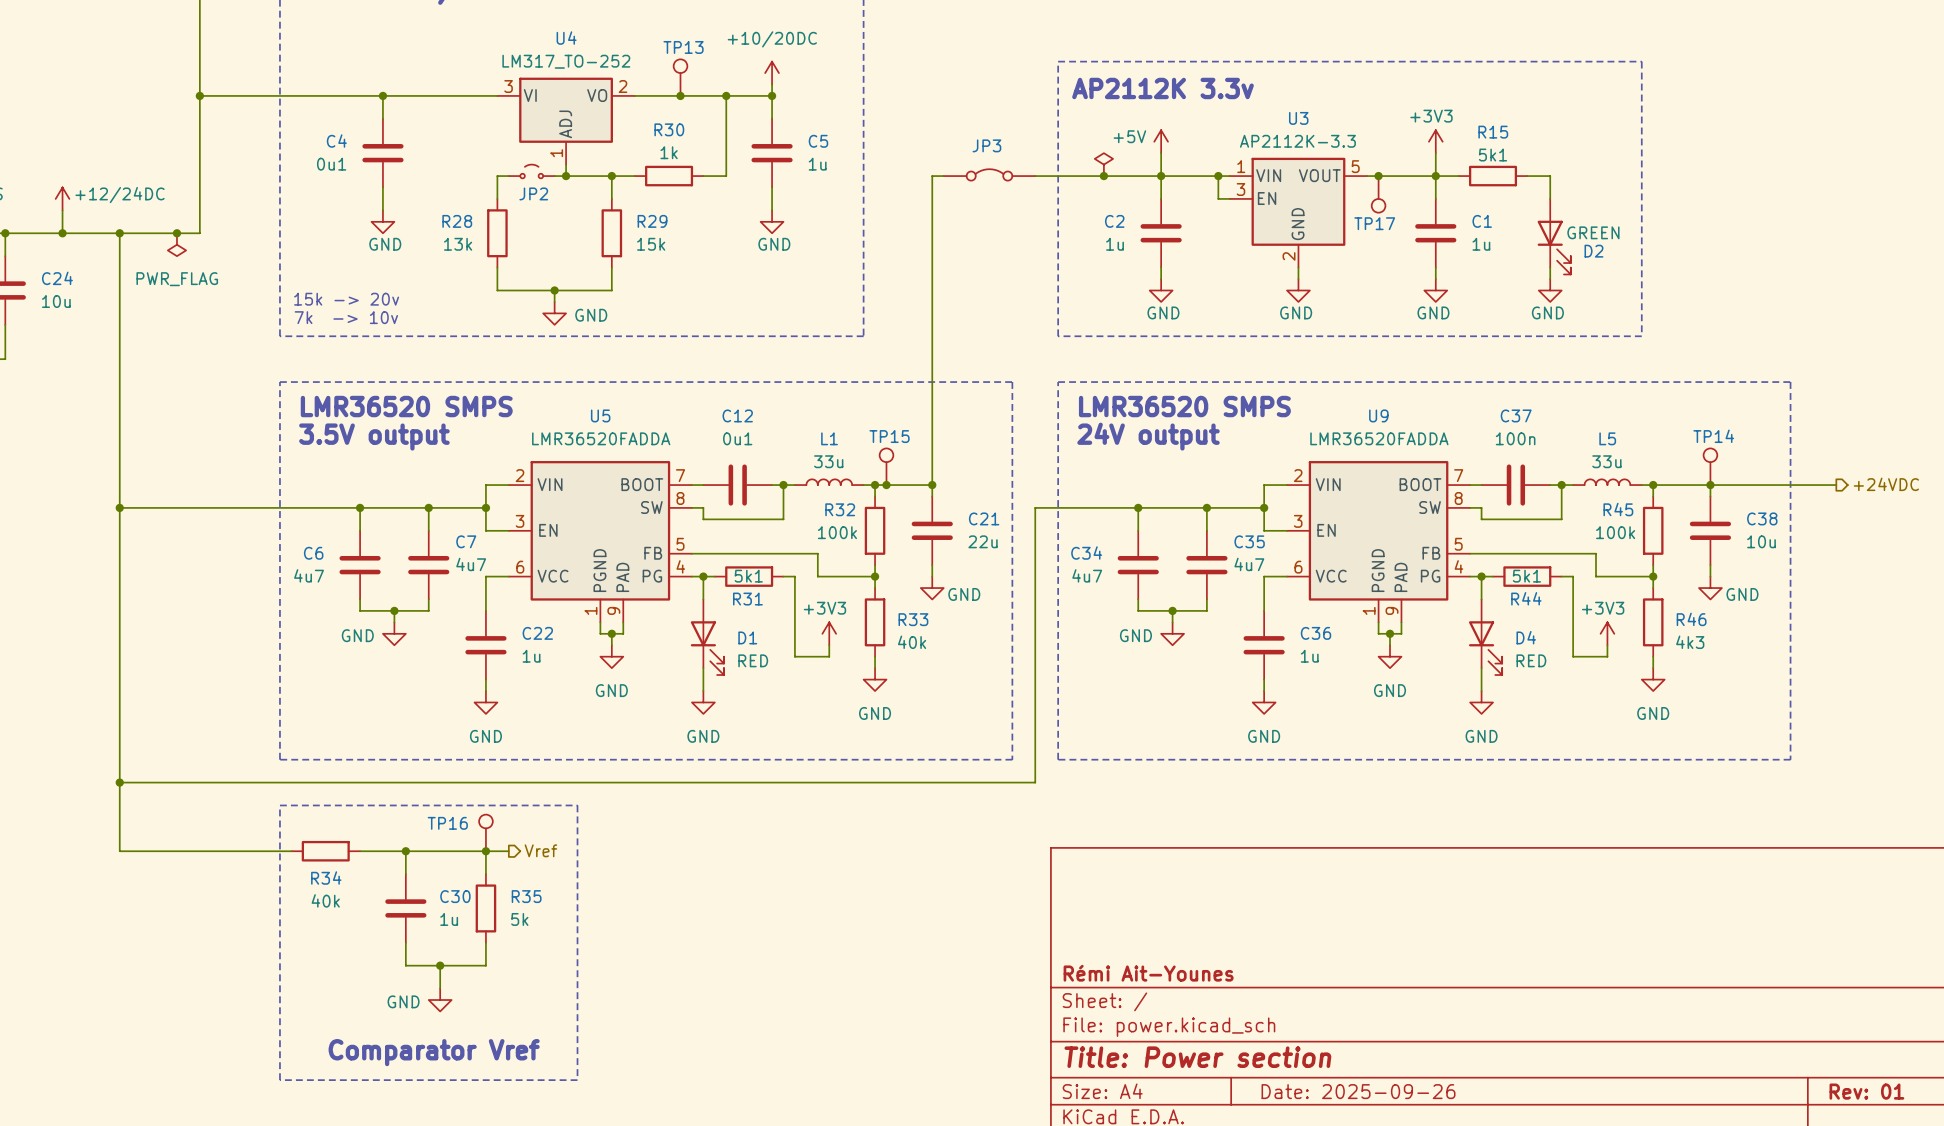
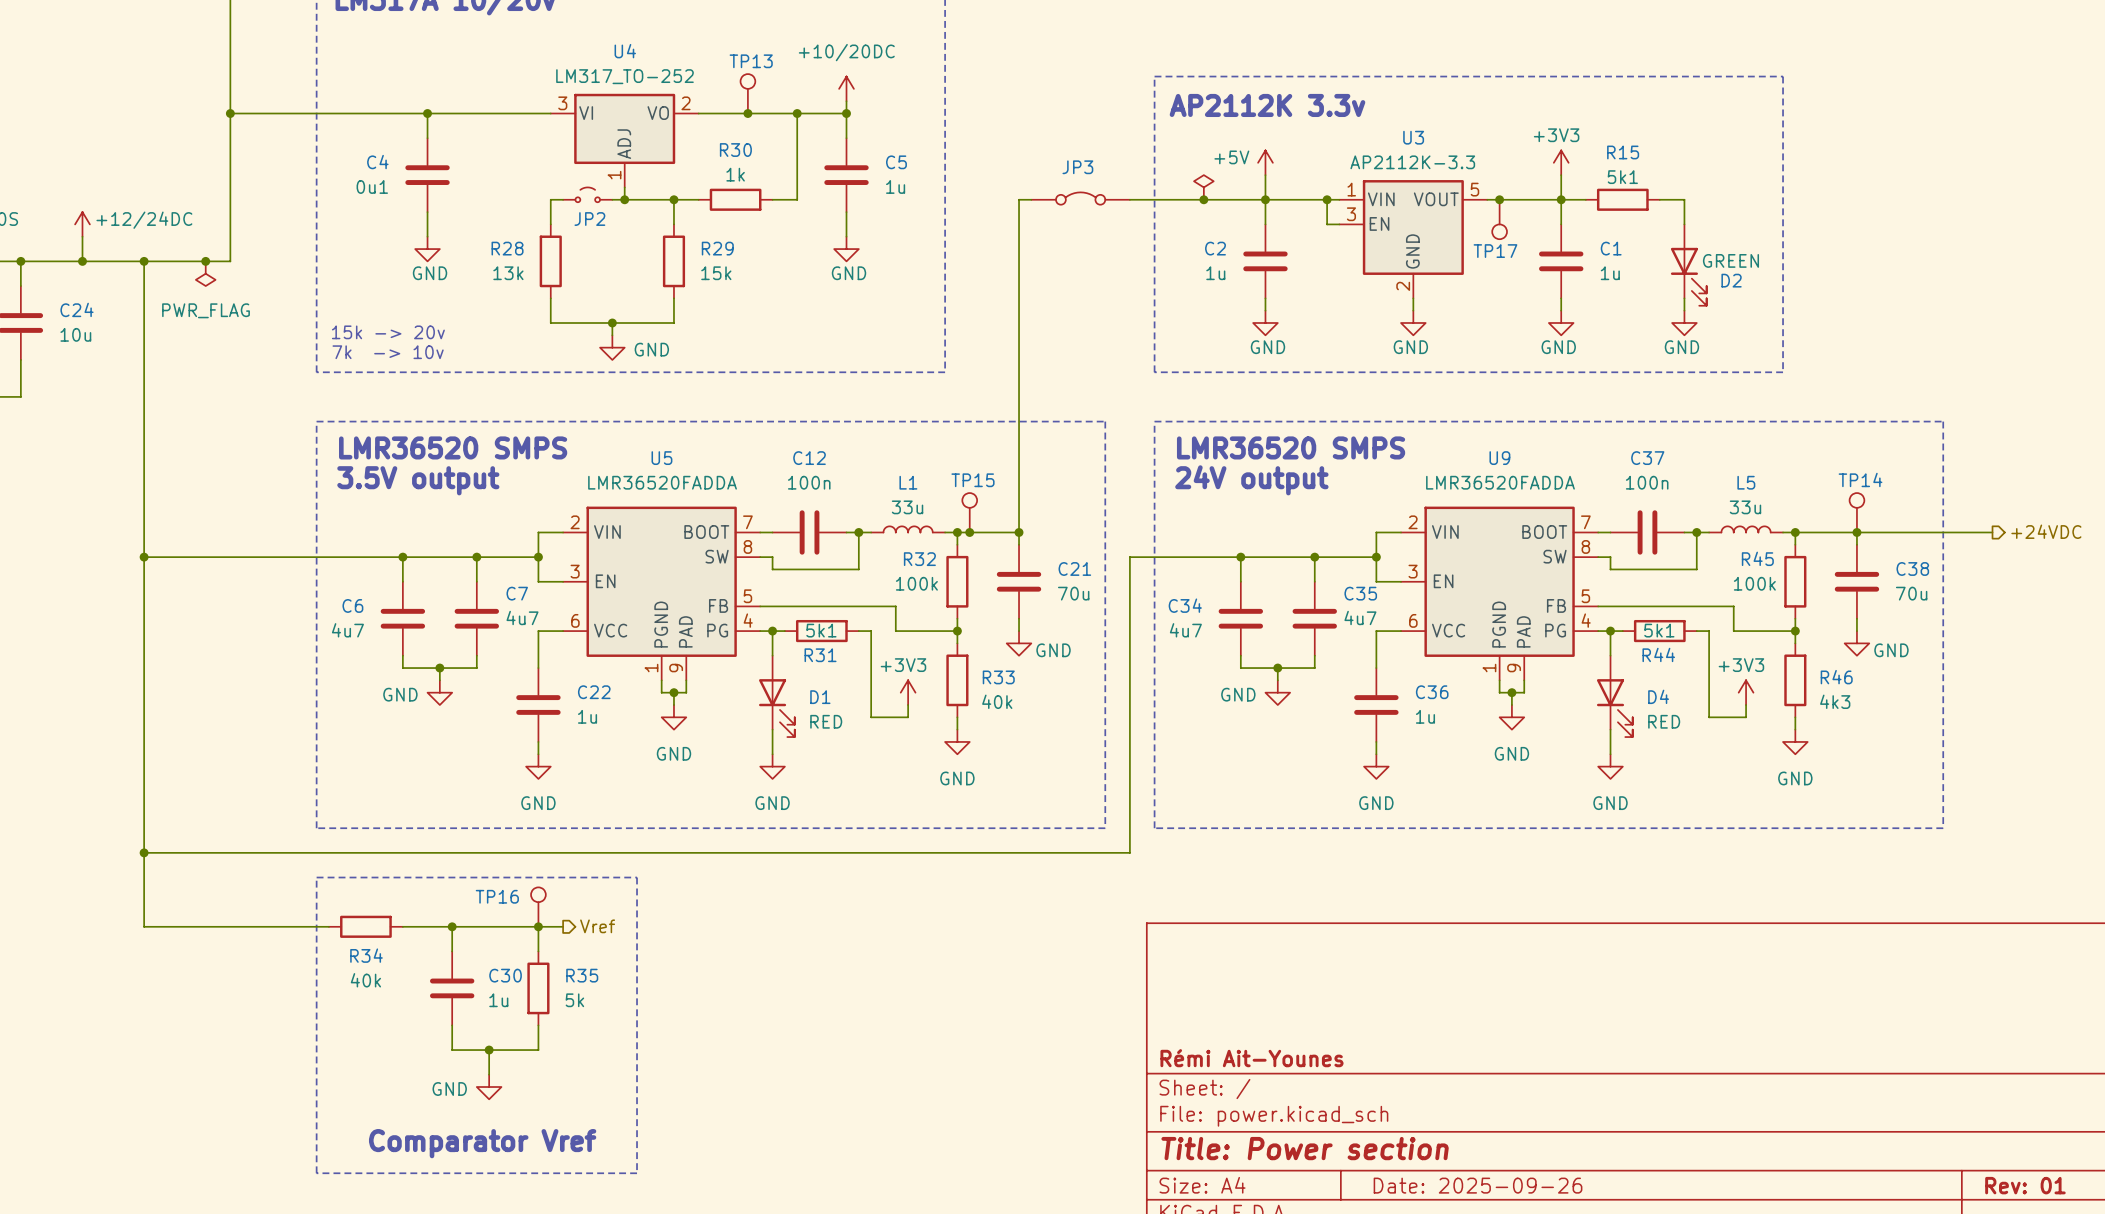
C12 value: 0u1 (737, 438) -> 100n (809, 482)
C21 value: 22u (983, 541) -> 70u (1073, 593)
C38 value: 10u (1761, 541) -> 70u (1911, 593)

